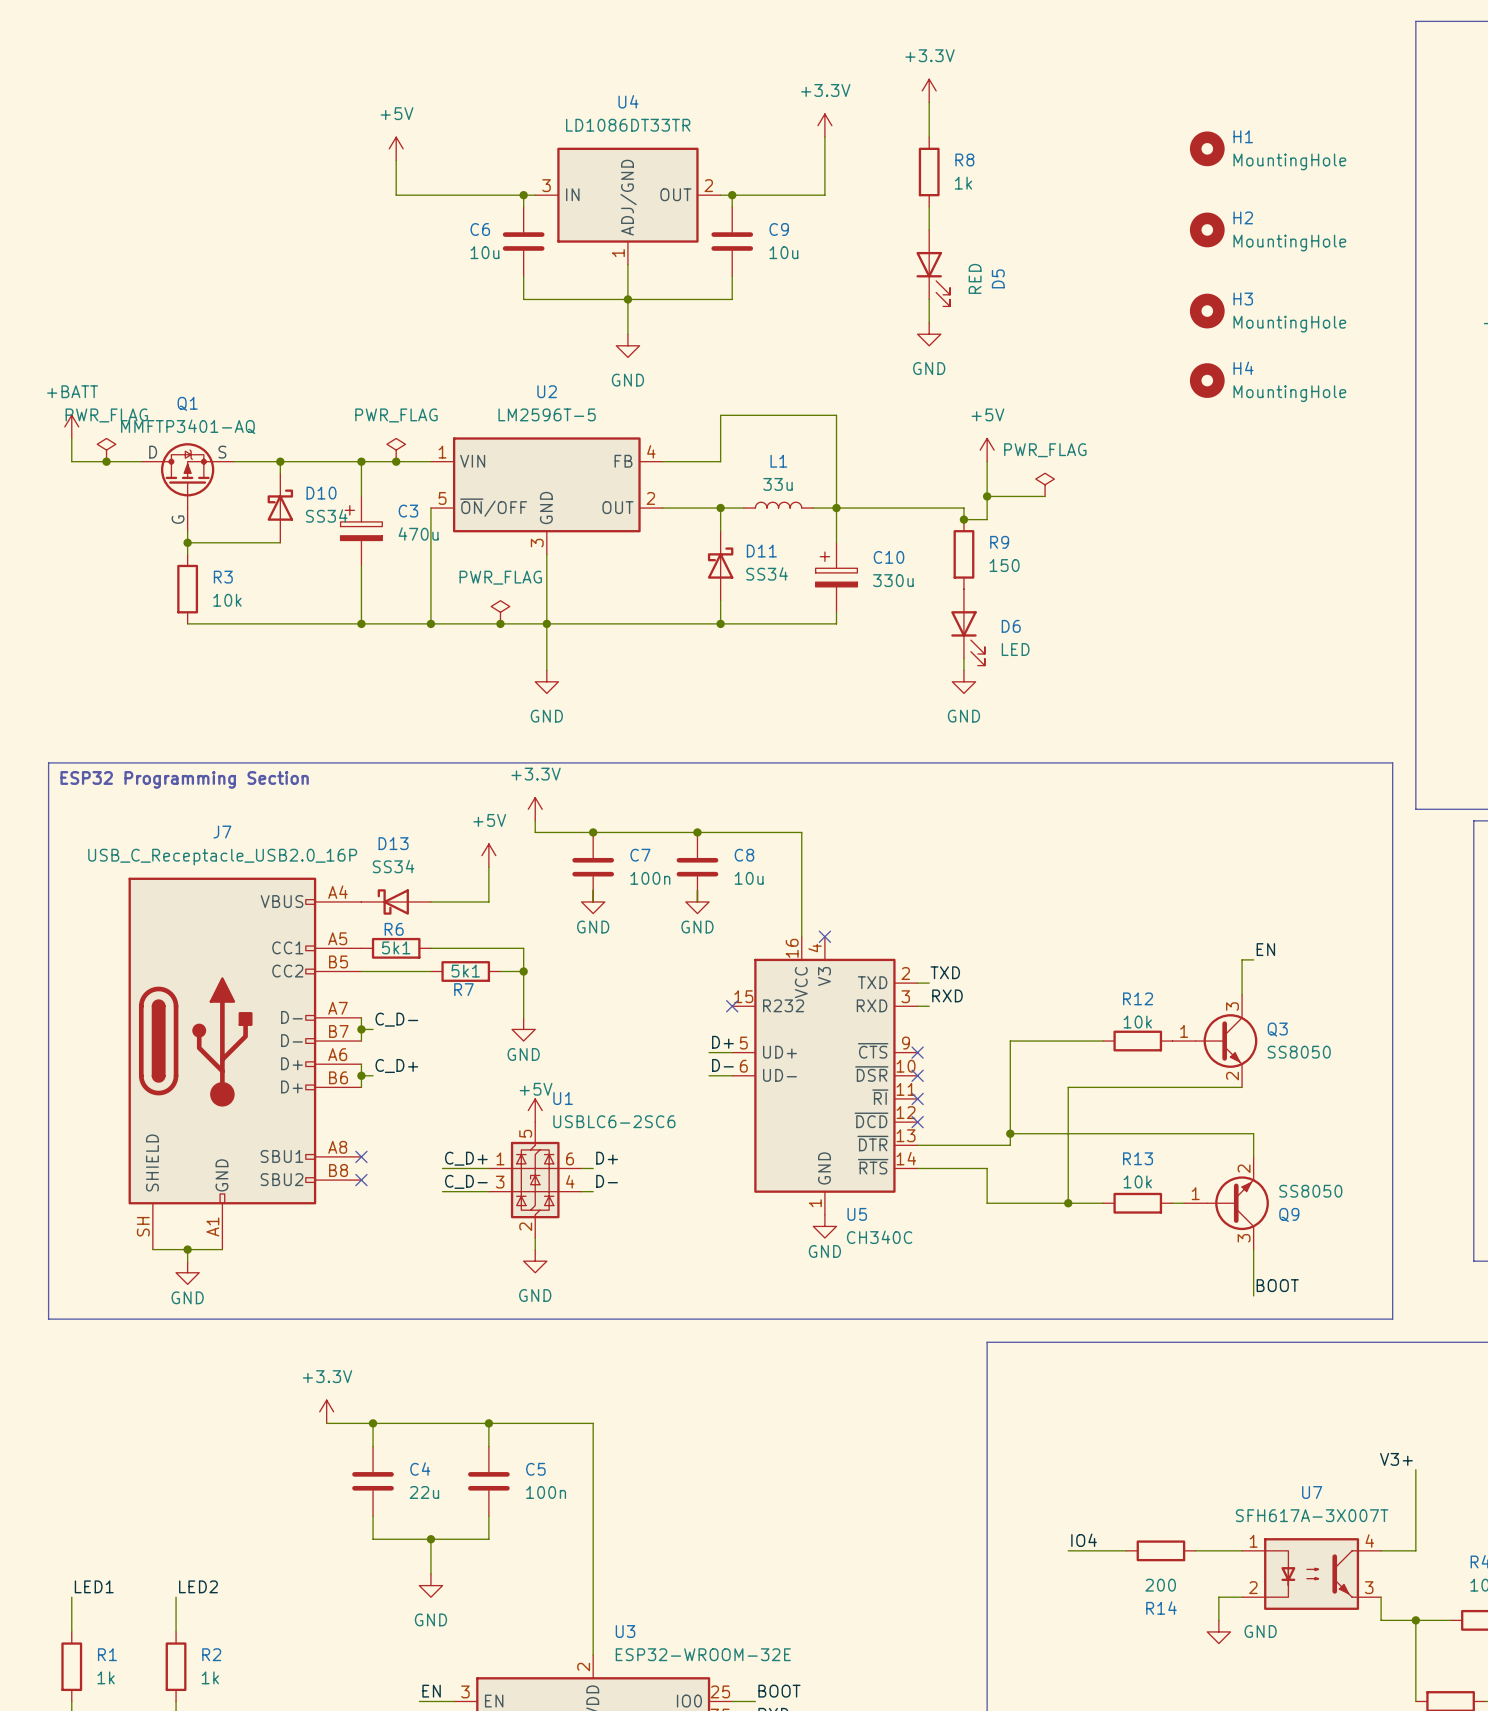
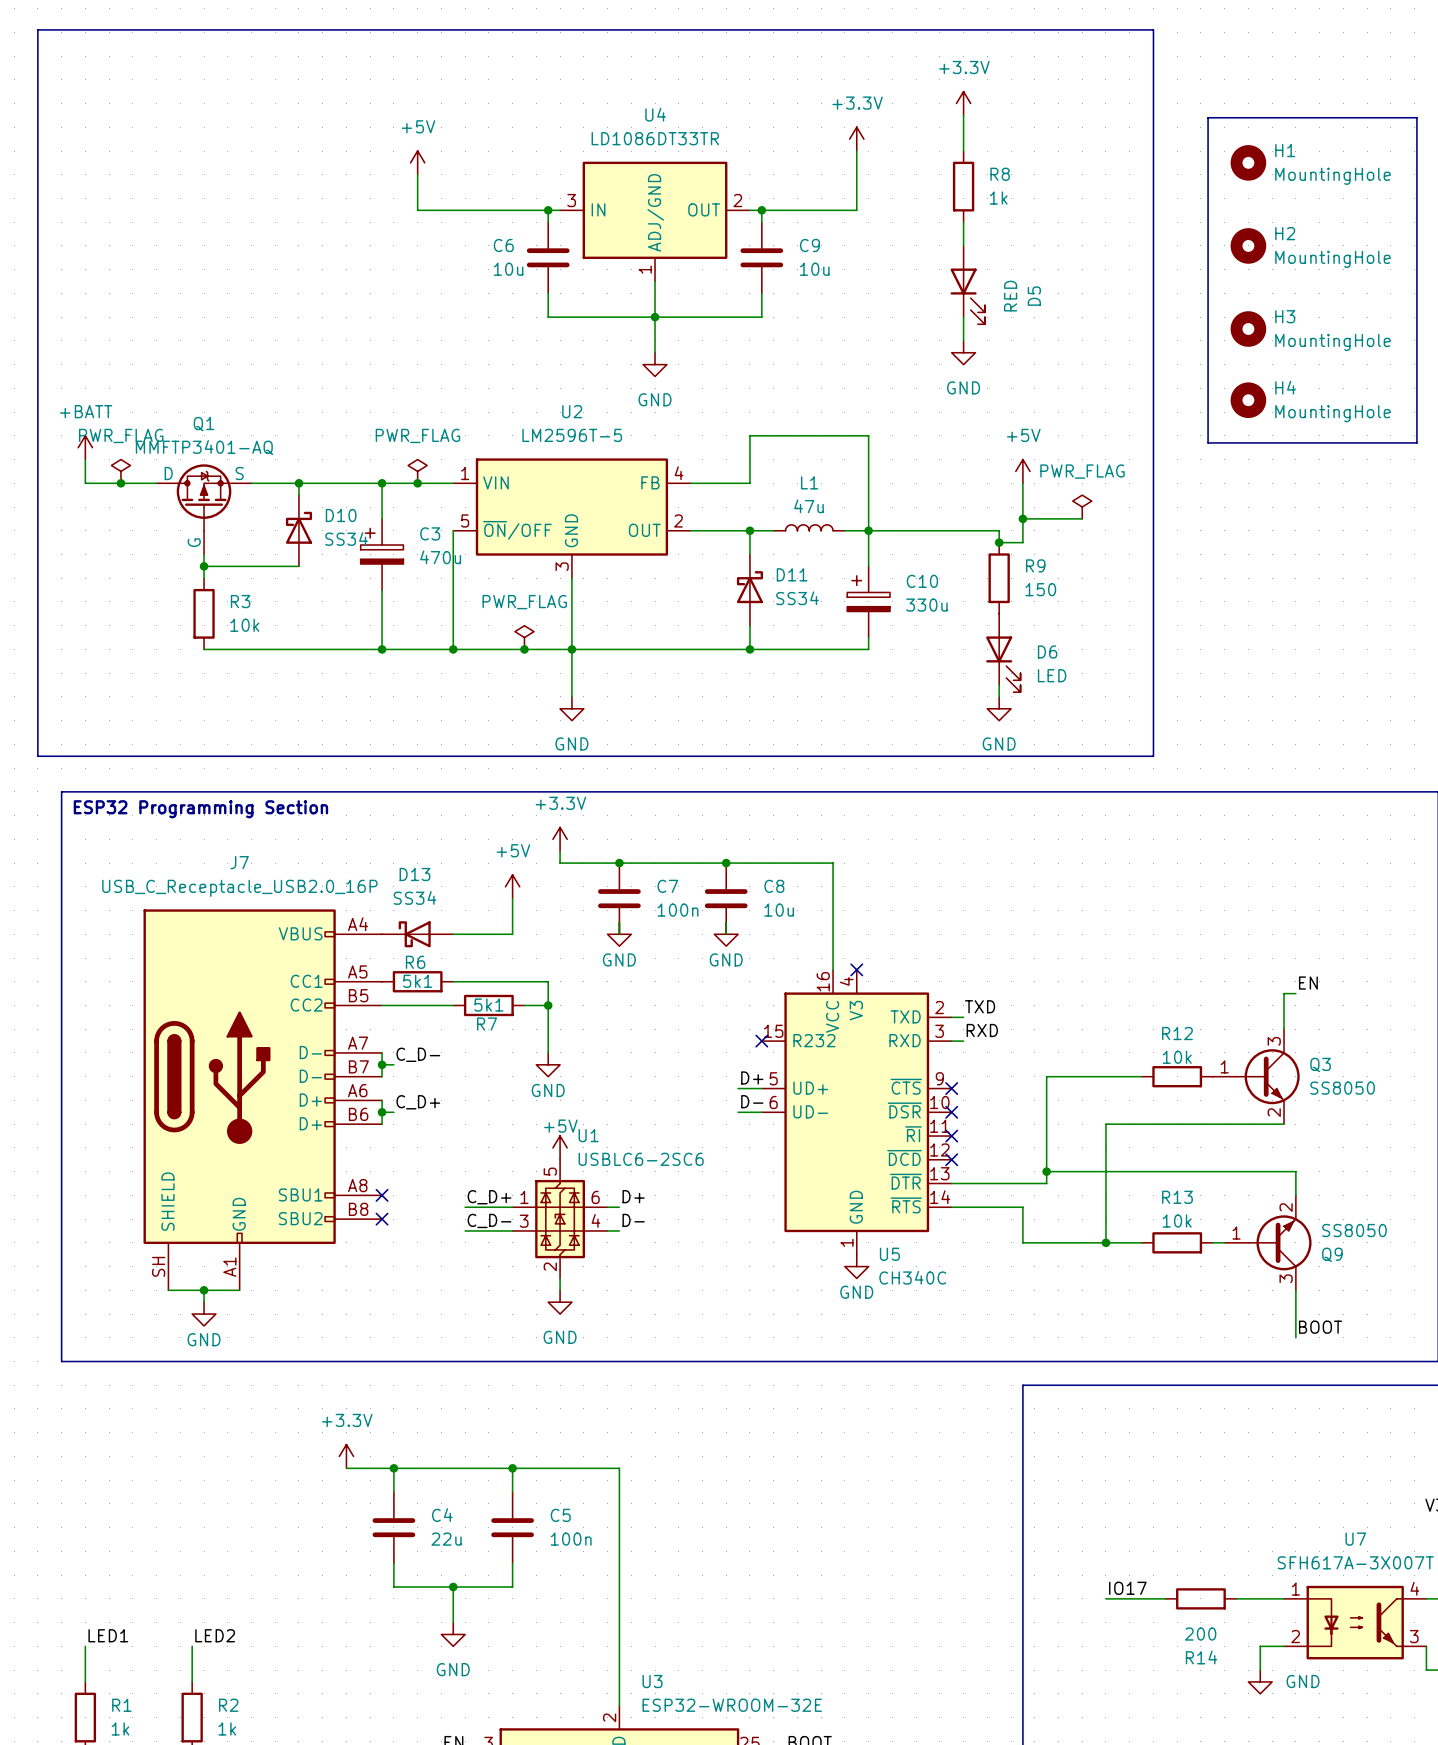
line: none -> (37, 29) (1153, 29) (1153, 756) (37, 756) (37, 29)
line: none -> (1208, 117) (1416, 117) (1416, 442) (1208, 442) (1208, 117)
L1 value: 33u (778, 484) -> 47u (809, 506)
label: IO4 (1084, 1540) -> IO17 (1127, 1588)

